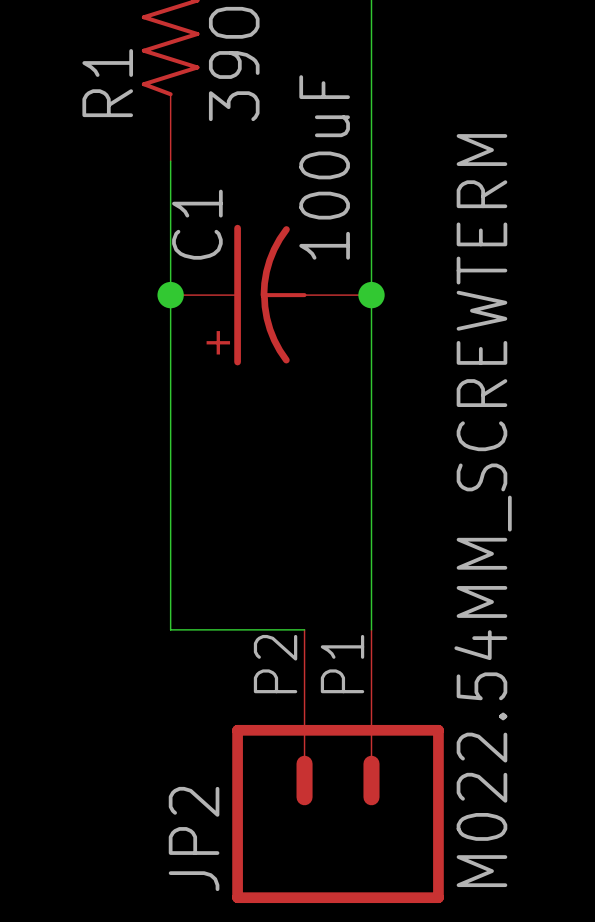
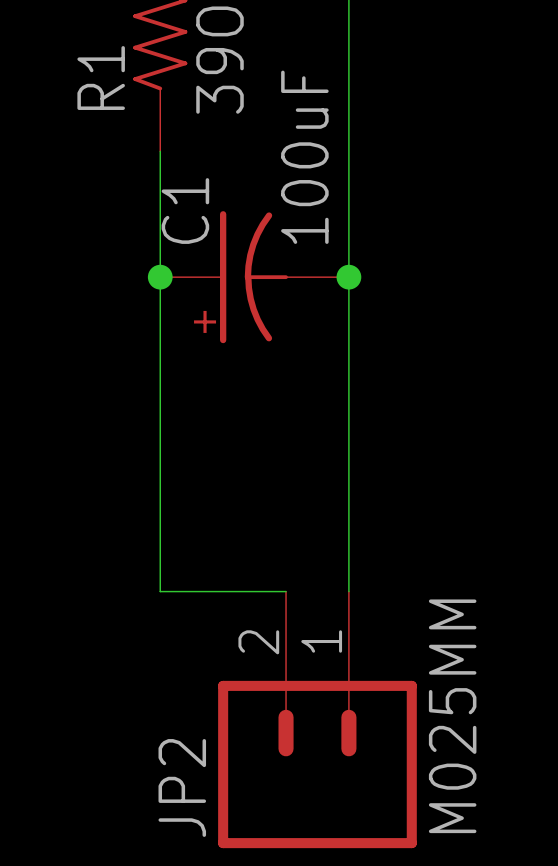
JP2 value: M022.54MM_SCREWTERM (483, 510) -> M025MM (452, 716)
JP2 pin number: P2 (275, 664) -> 2 (258, 642)
JP2 pin number: P1 (342, 664) -> 1 (321, 641)

